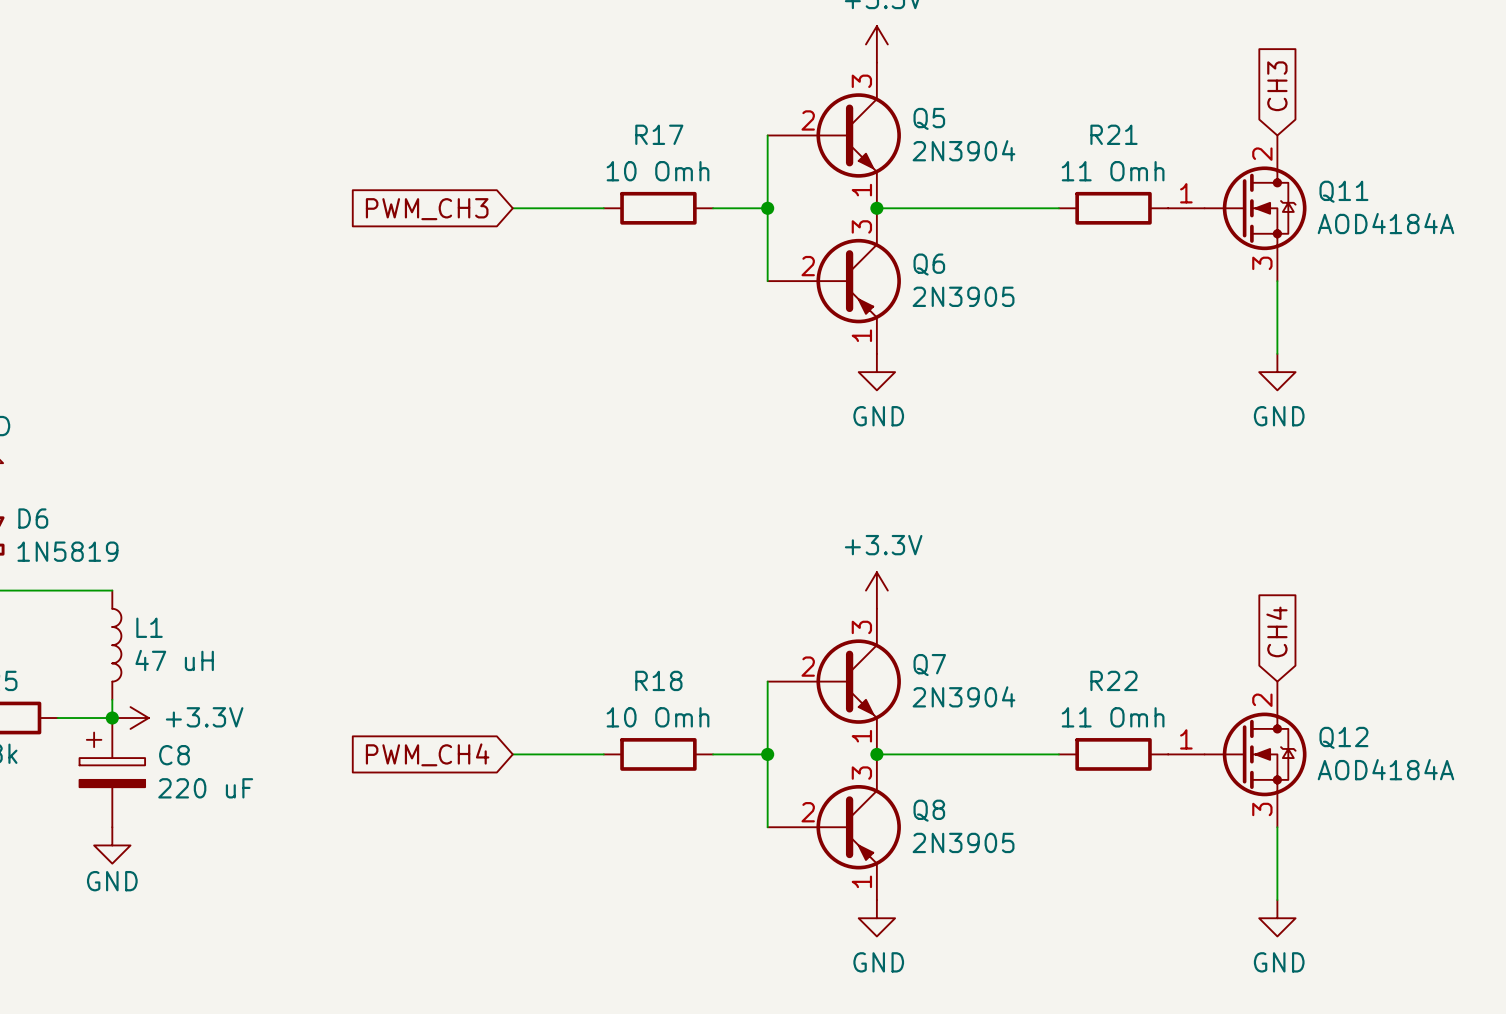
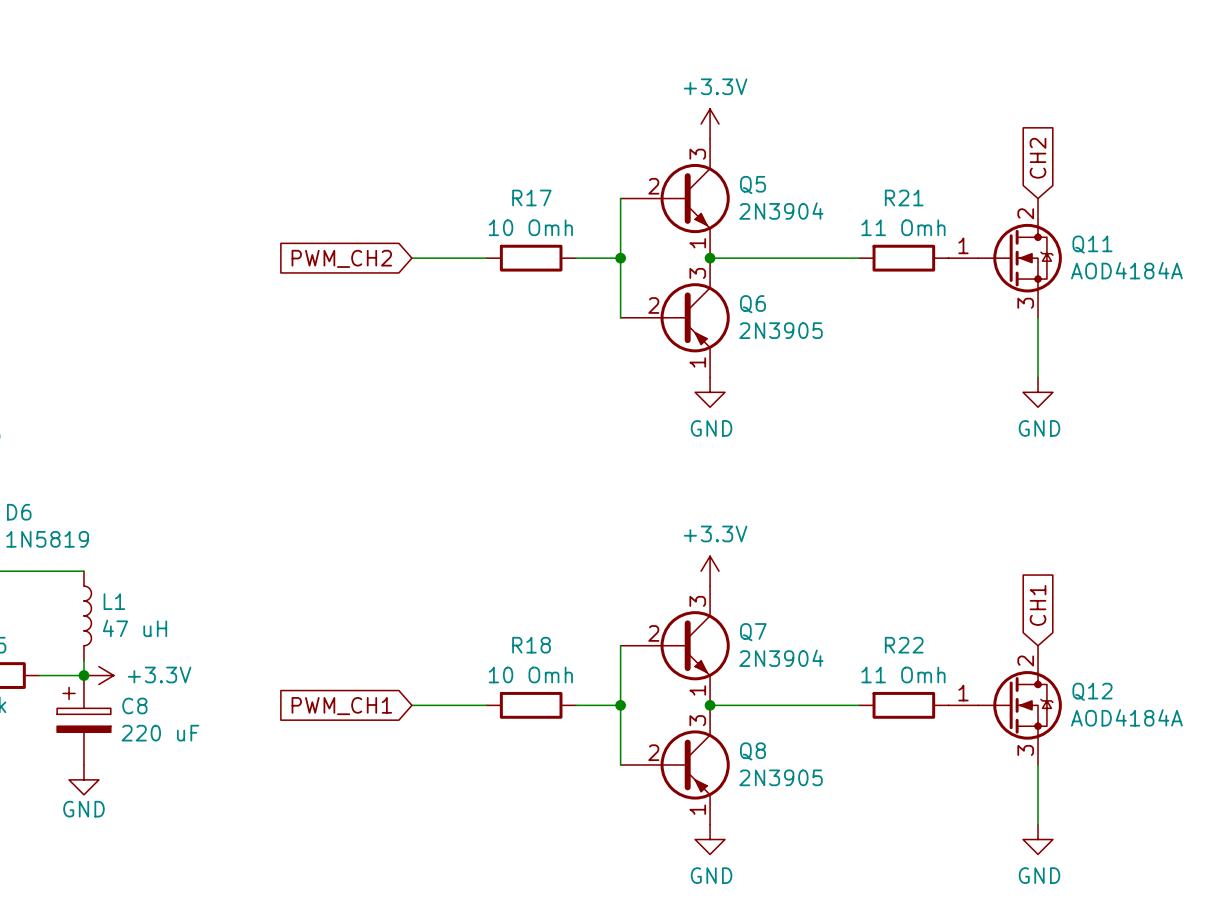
global label: CH3 (1277, 86) -> CH2 (1038, 158)
global label: PWM_CH3 (427, 209) -> PWM_CH2 (341, 258)
global label: CH4 (1276, 631) -> CH1 (1038, 605)
global label: PWM_CH4 (427, 754) -> PWM_CH1 (341, 706)

